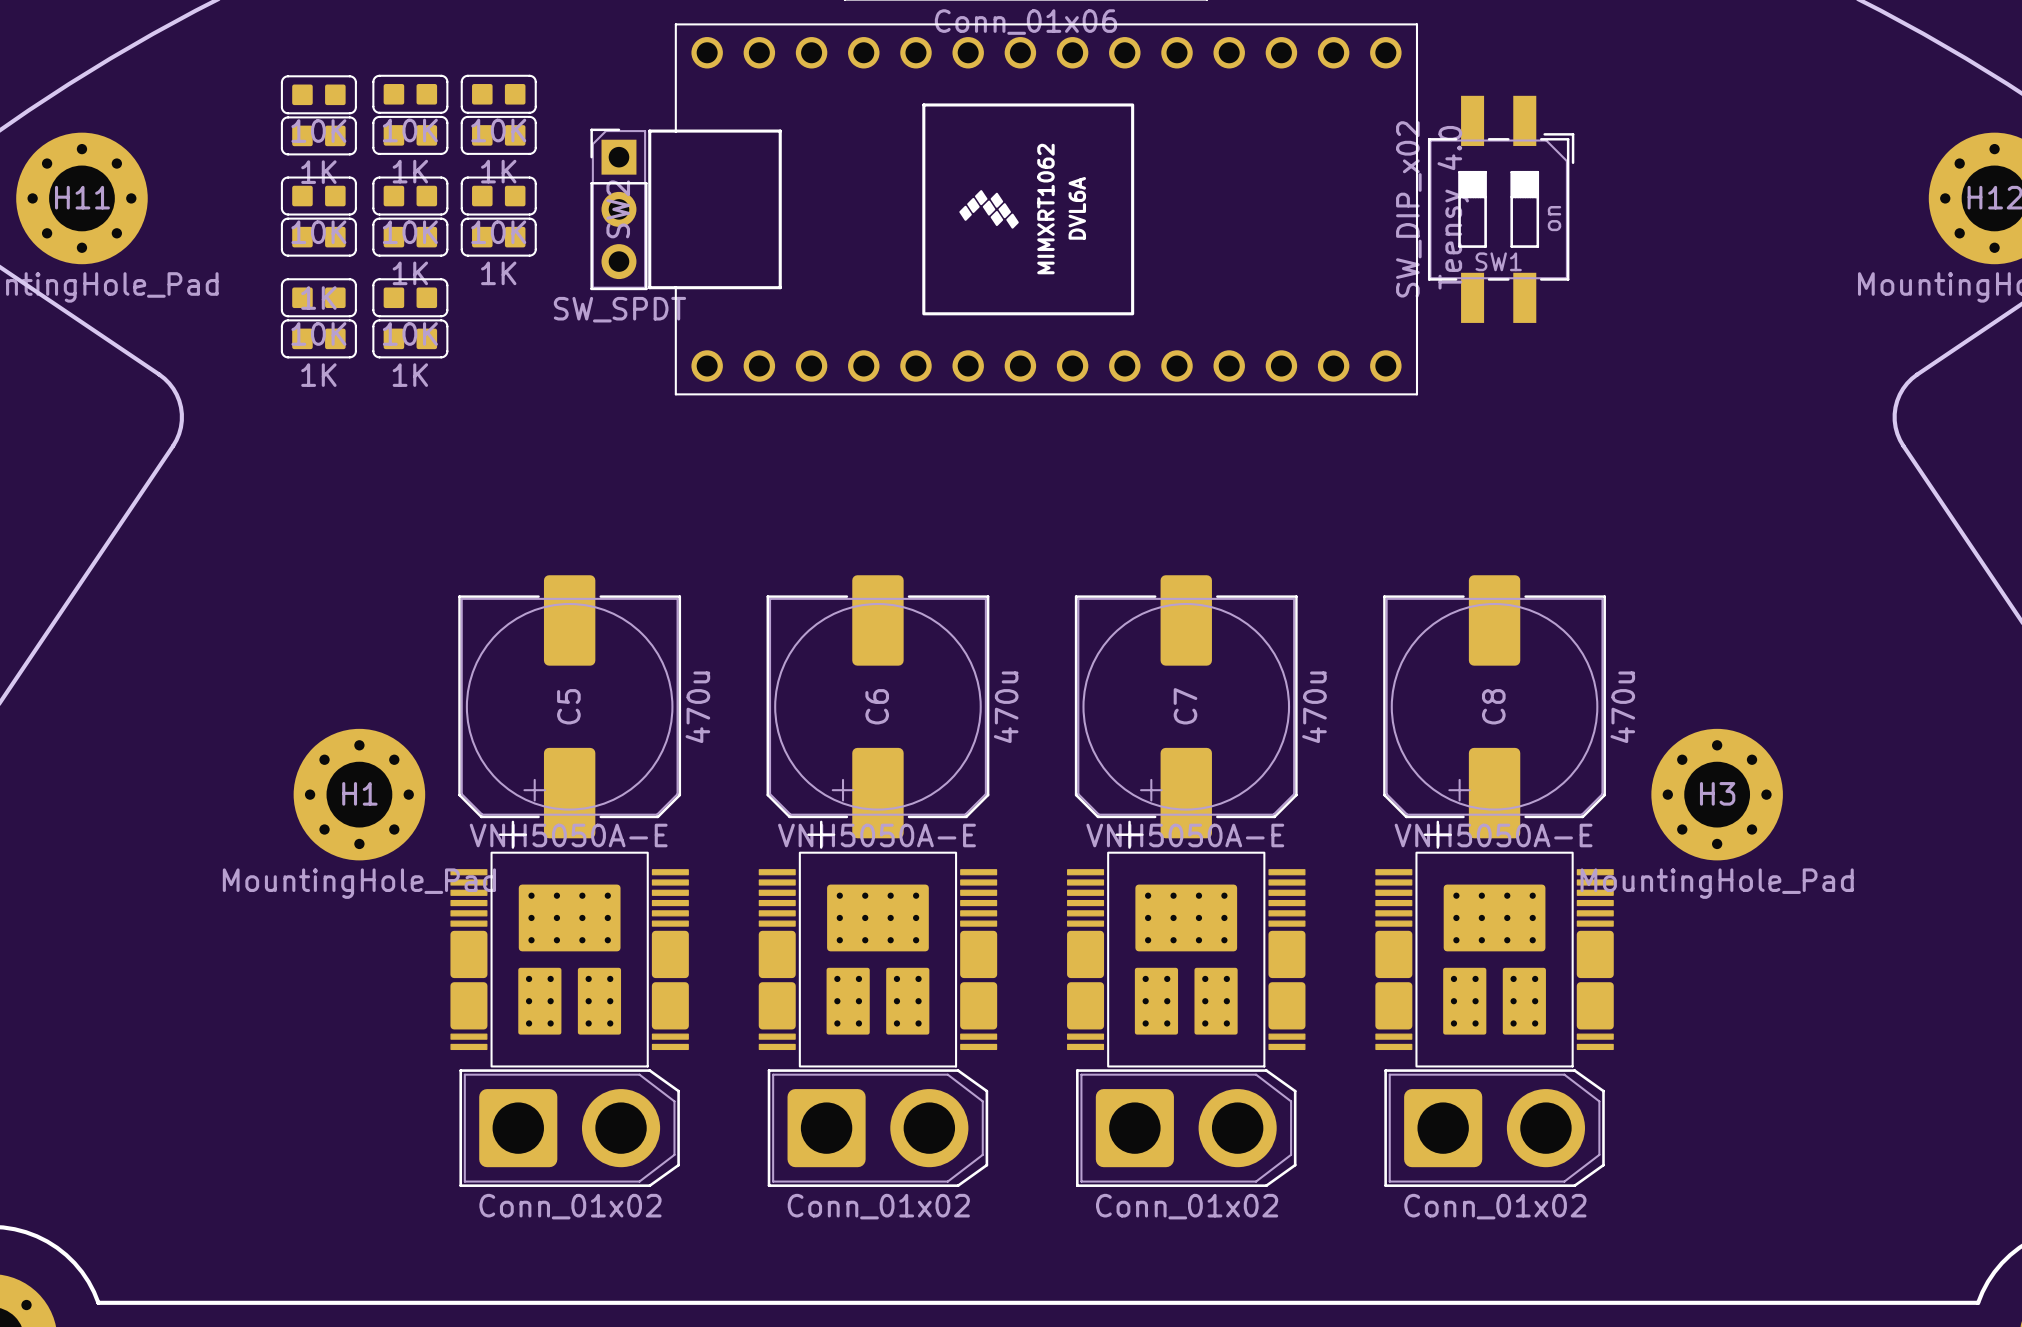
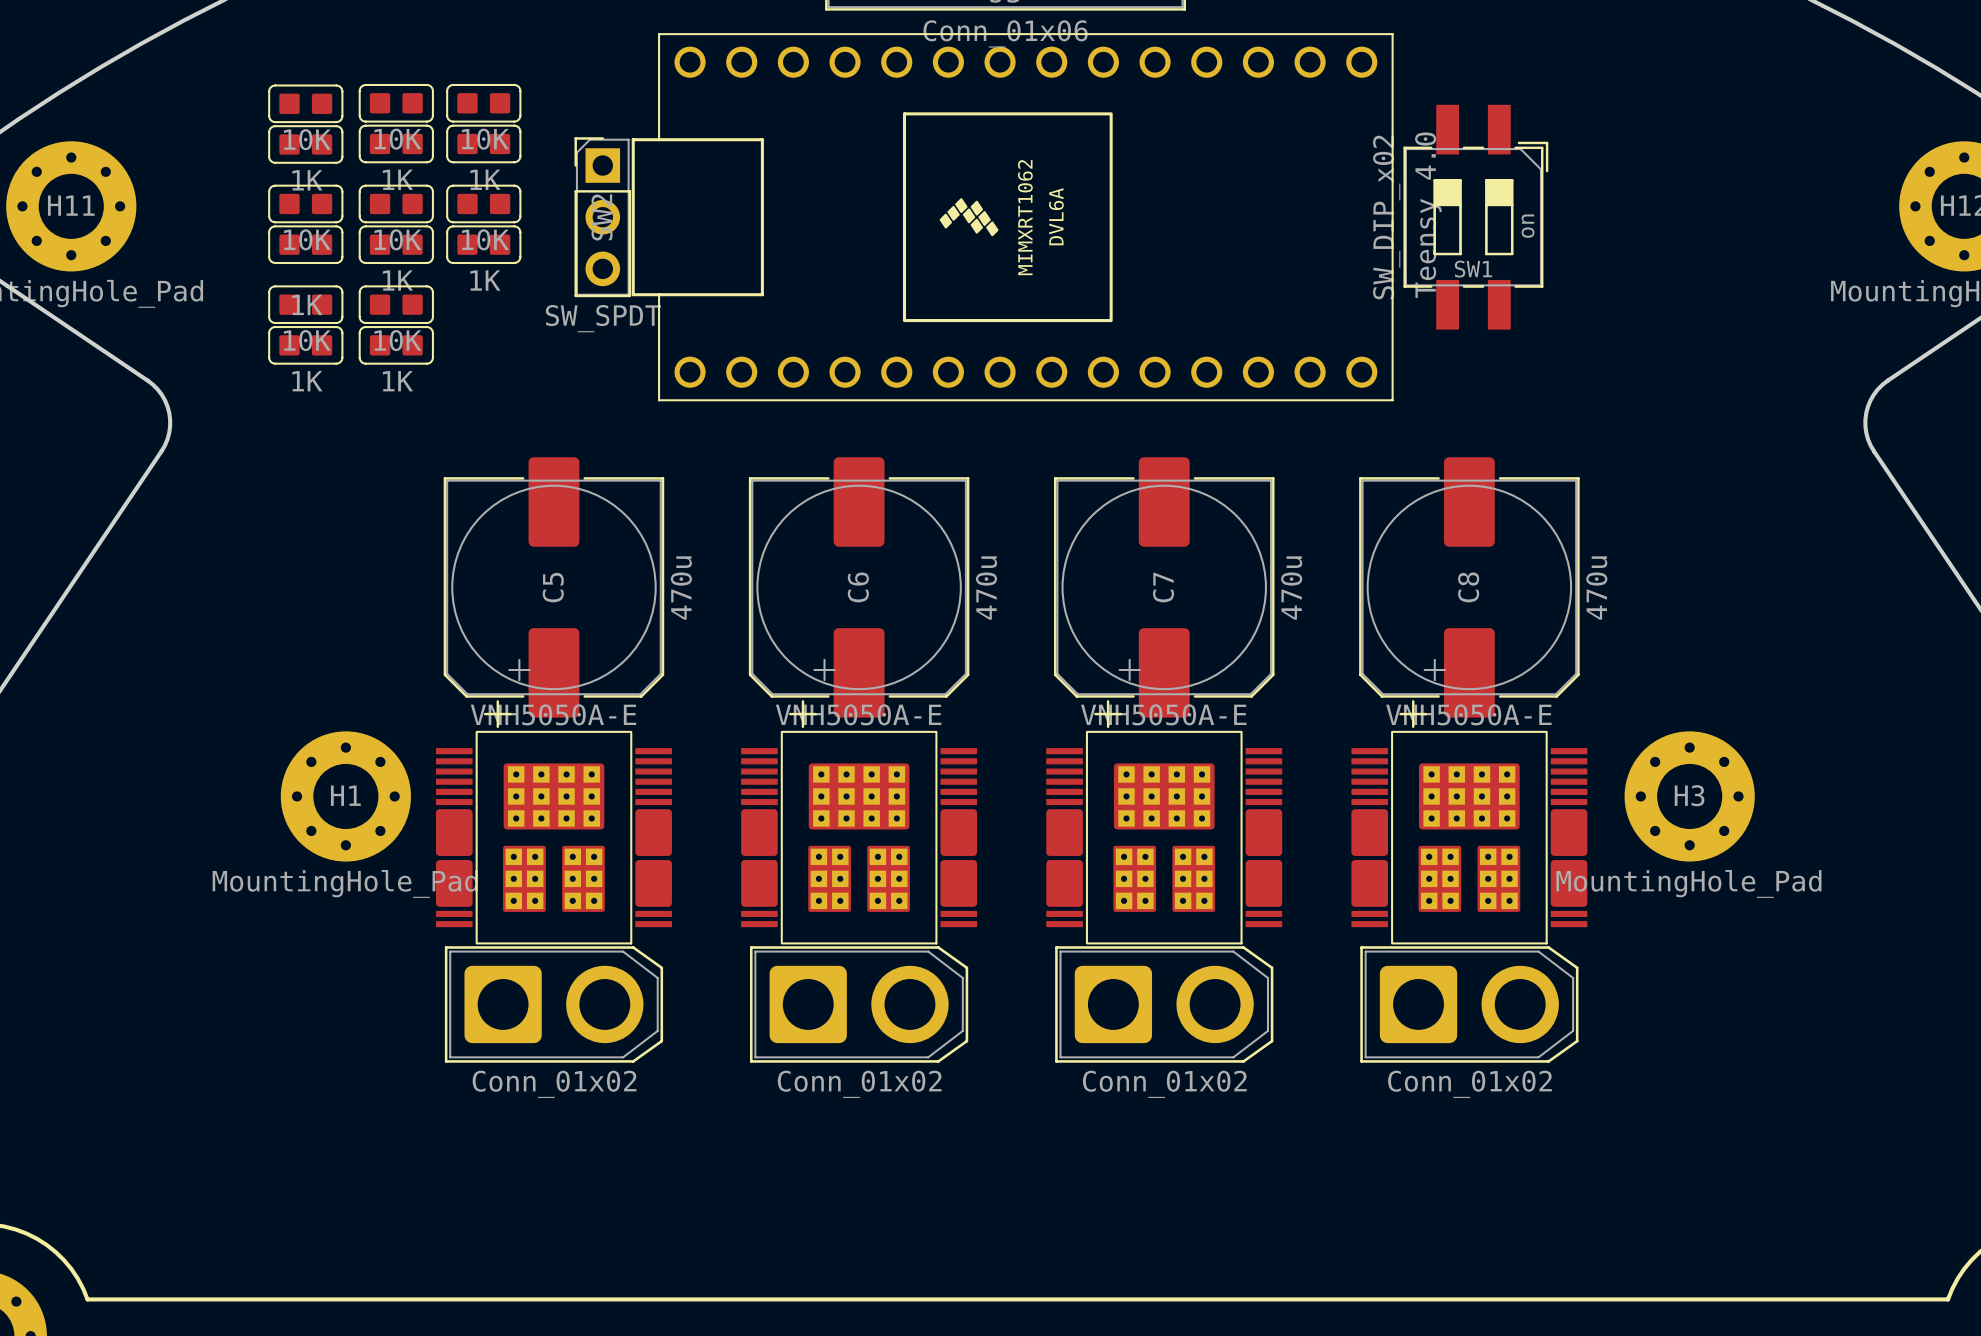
C5 position: (569, 712) -> (553, 592)
C6 position: (877, 712) -> (859, 592)
C7 position: (1186, 712) -> (1164, 592)
C8 position: (1494, 712) -> (1469, 592)
part position: (569, 959) -> (553, 837)
part position: (877, 959) -> (859, 837)
part position: (1186, 959) -> (1164, 837)
part position: (1494, 959) -> (1469, 837)
part position: (569, 1128) -> (553, 1004)
part position: (877, 1128) -> (859, 1004)
part position: (1186, 1128) -> (1164, 1004)
part position: (1494, 1128) -> (1469, 1004)

